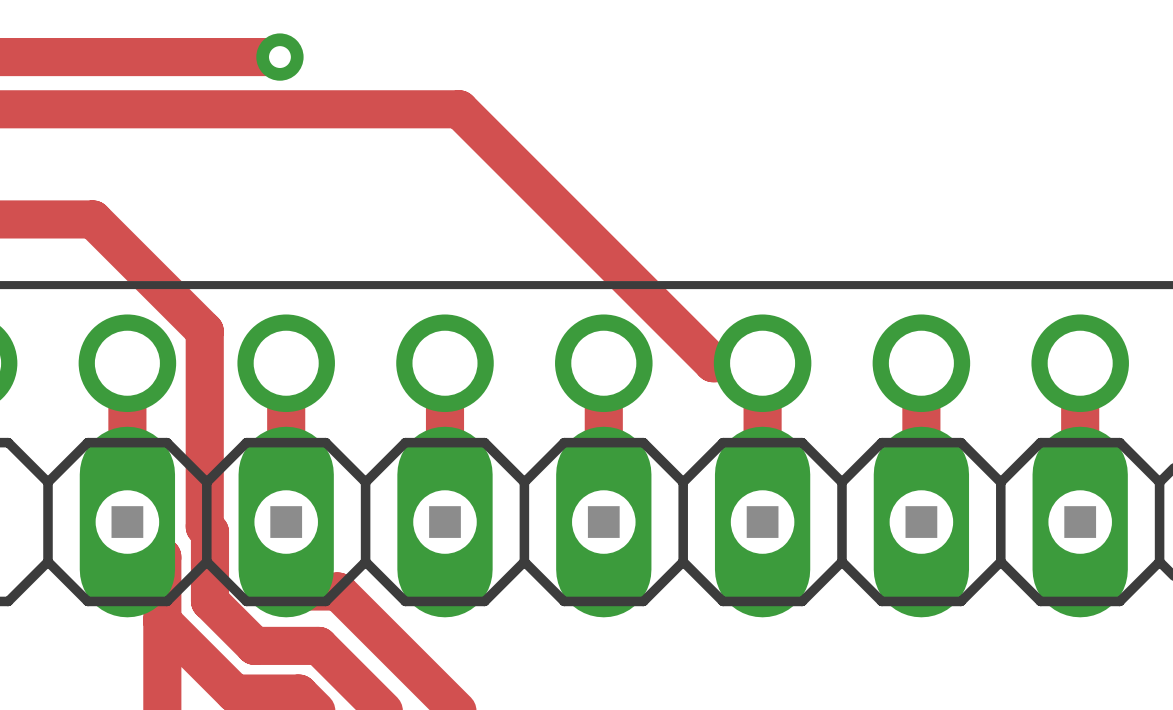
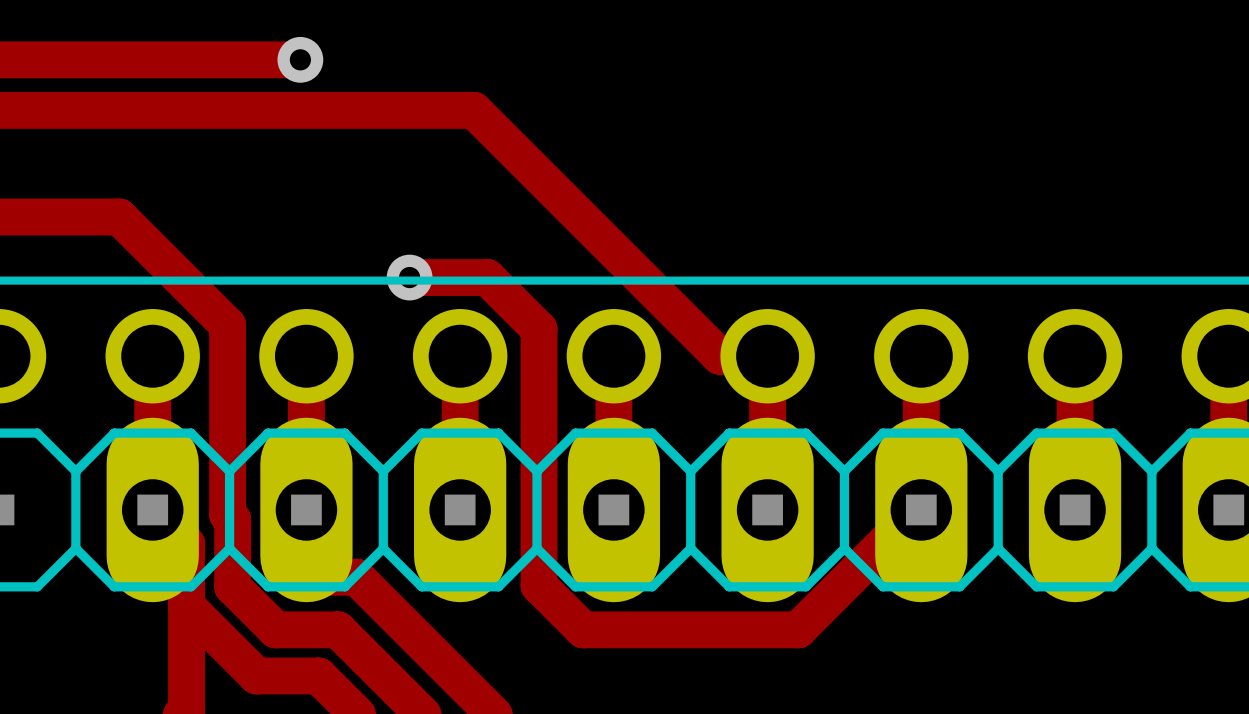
track: none -> (409, 277) (487, 277) (539, 329) (539, 585) (583, 629) (798, 629) (918, 509) (921, 509)
via: none -> (409, 277)

